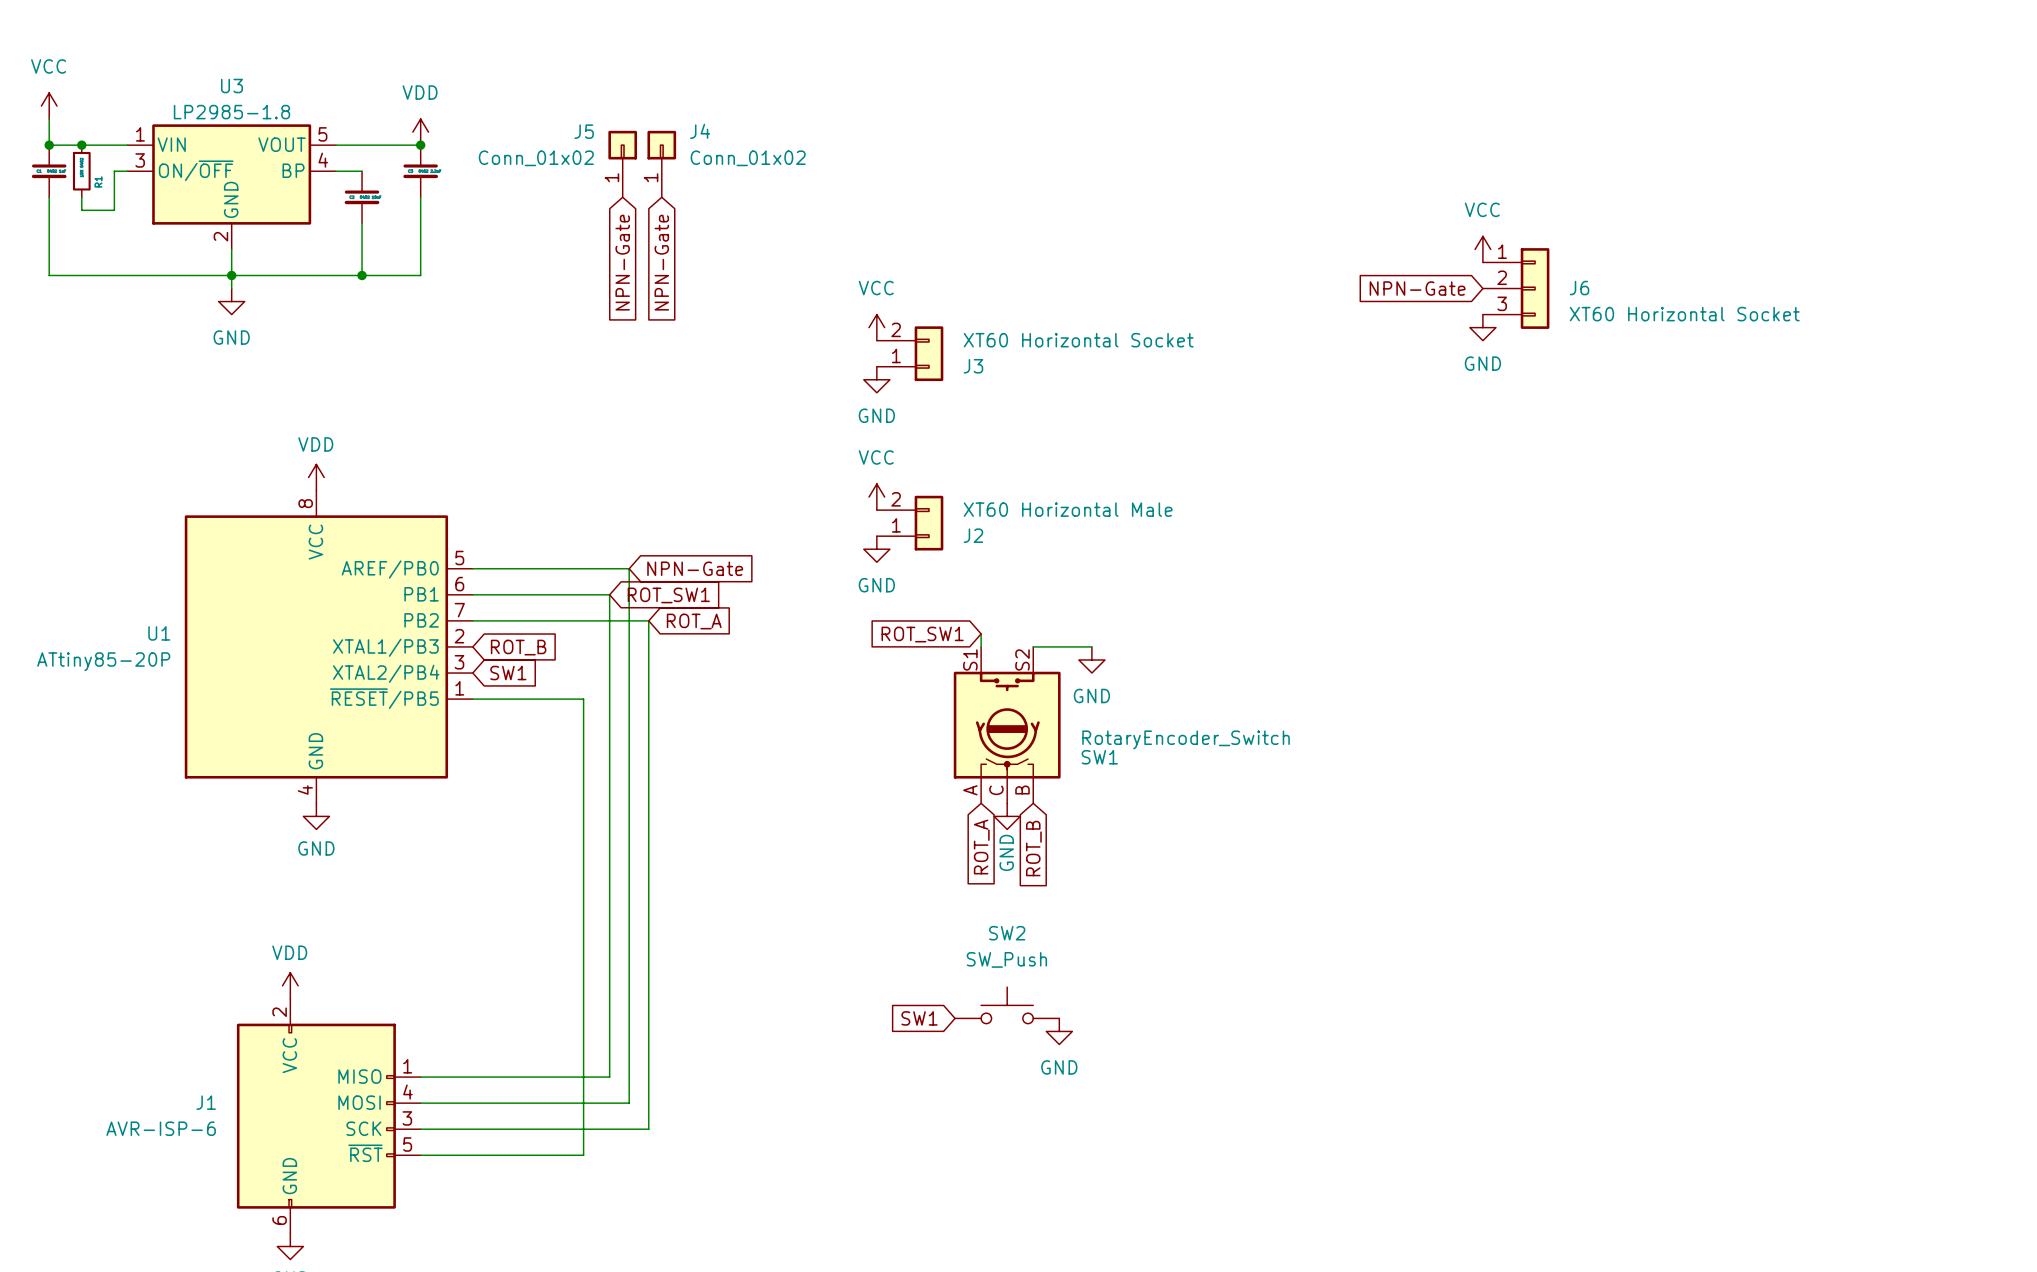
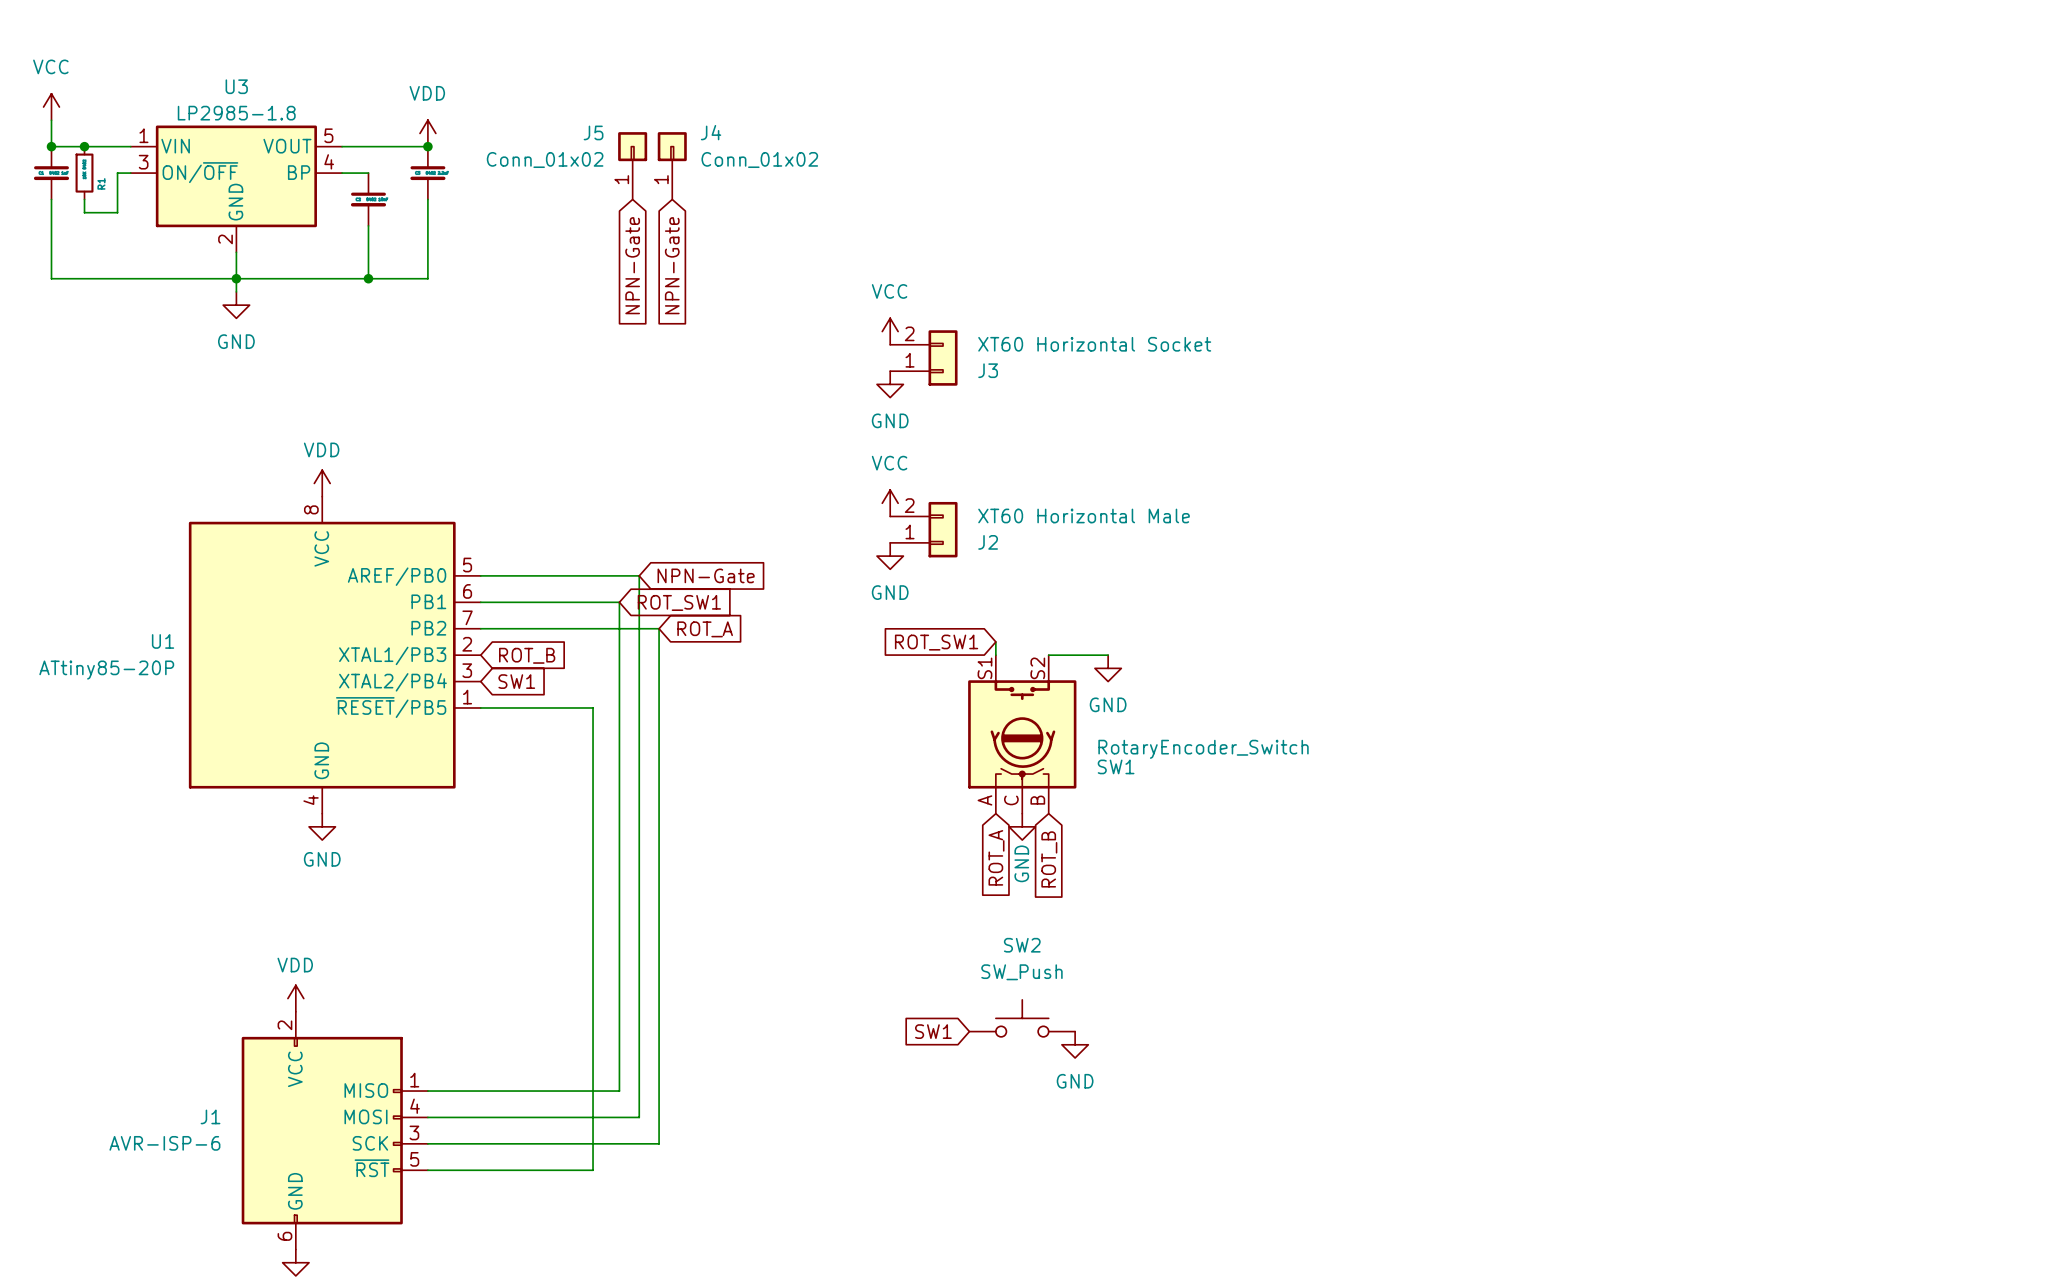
power symbol: VCC (1482, 249) -> none
global label: NPN-Gate (1417, 288) -> none
J6: XT60 Horizontal Socket (1516, 288) -> none
power symbol: GND (1482, 327) -> none

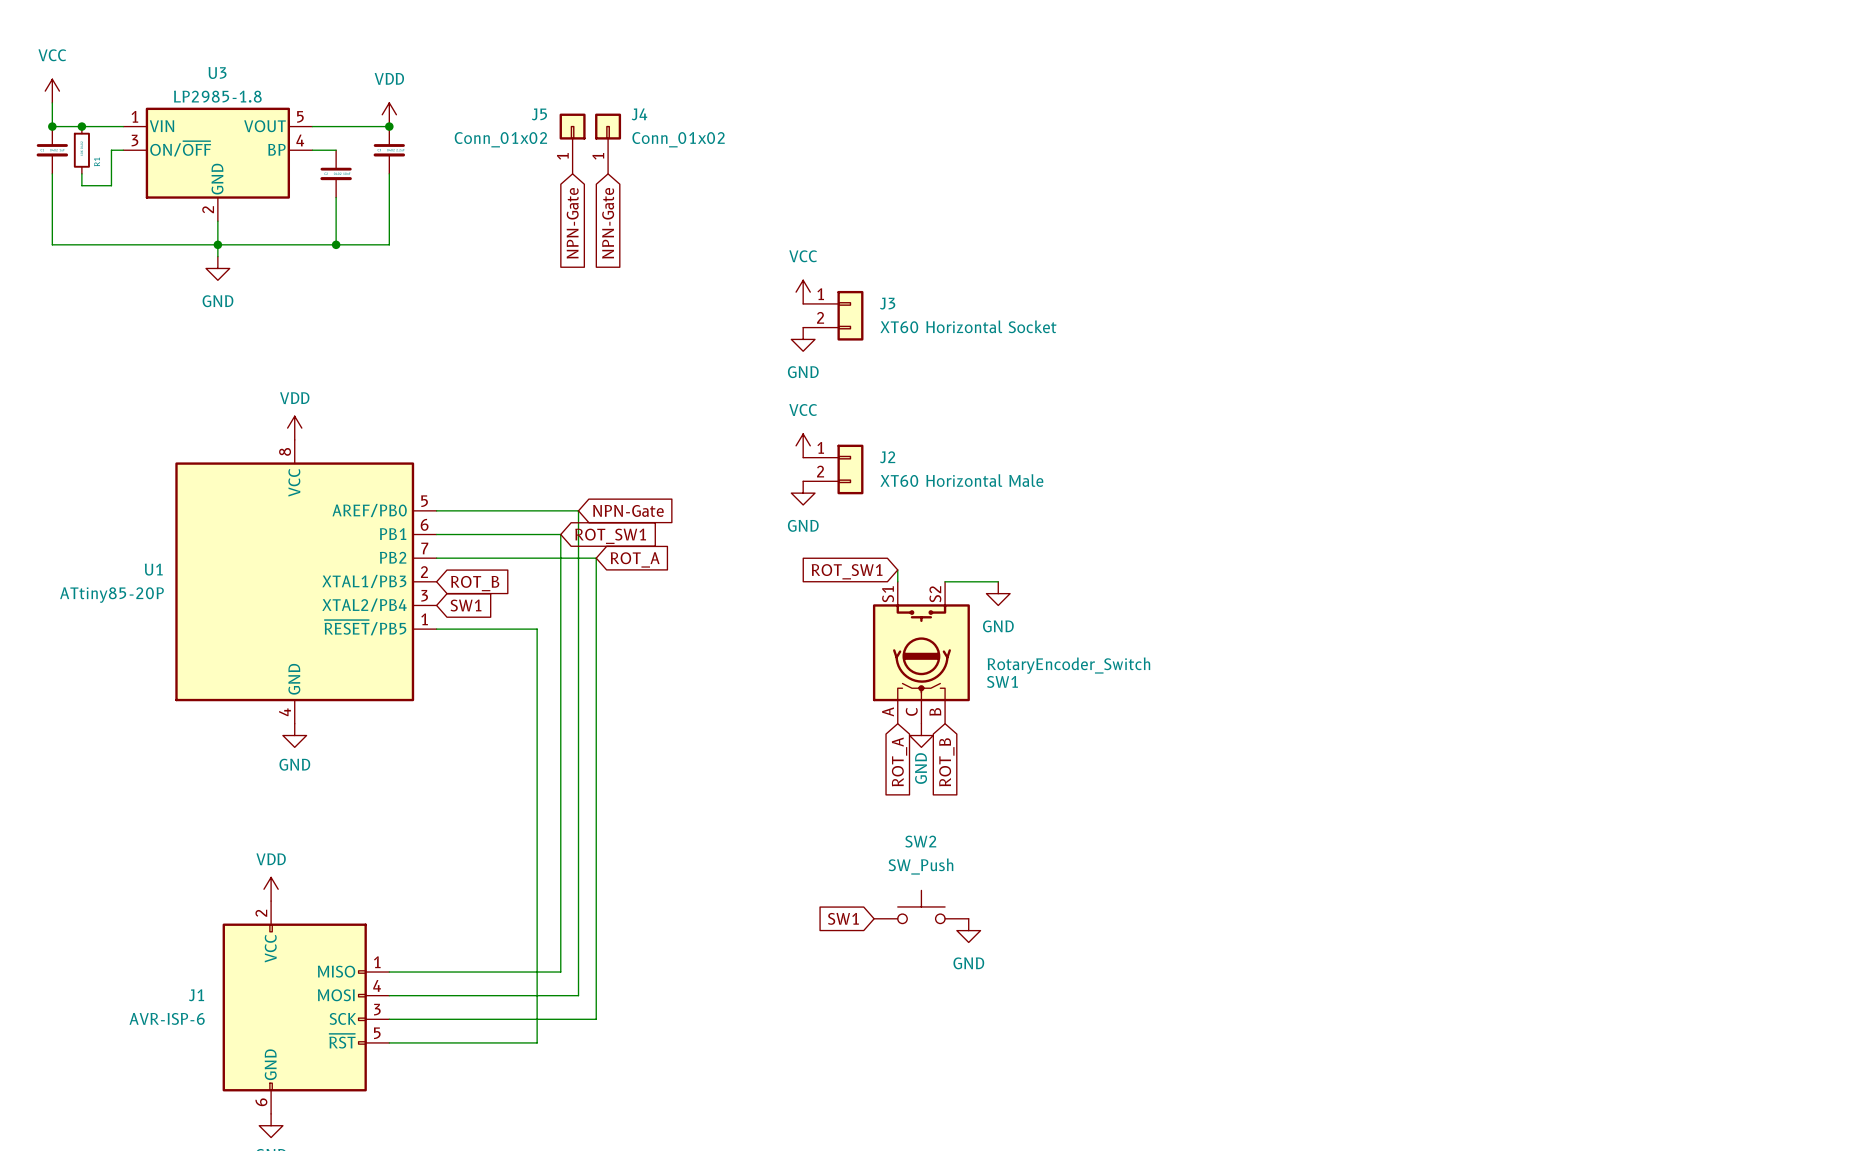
J3 flip: as is (943, 357) -> up-down (850, 315)
J2 flip: as is (943, 529) -> up-down (850, 469)

